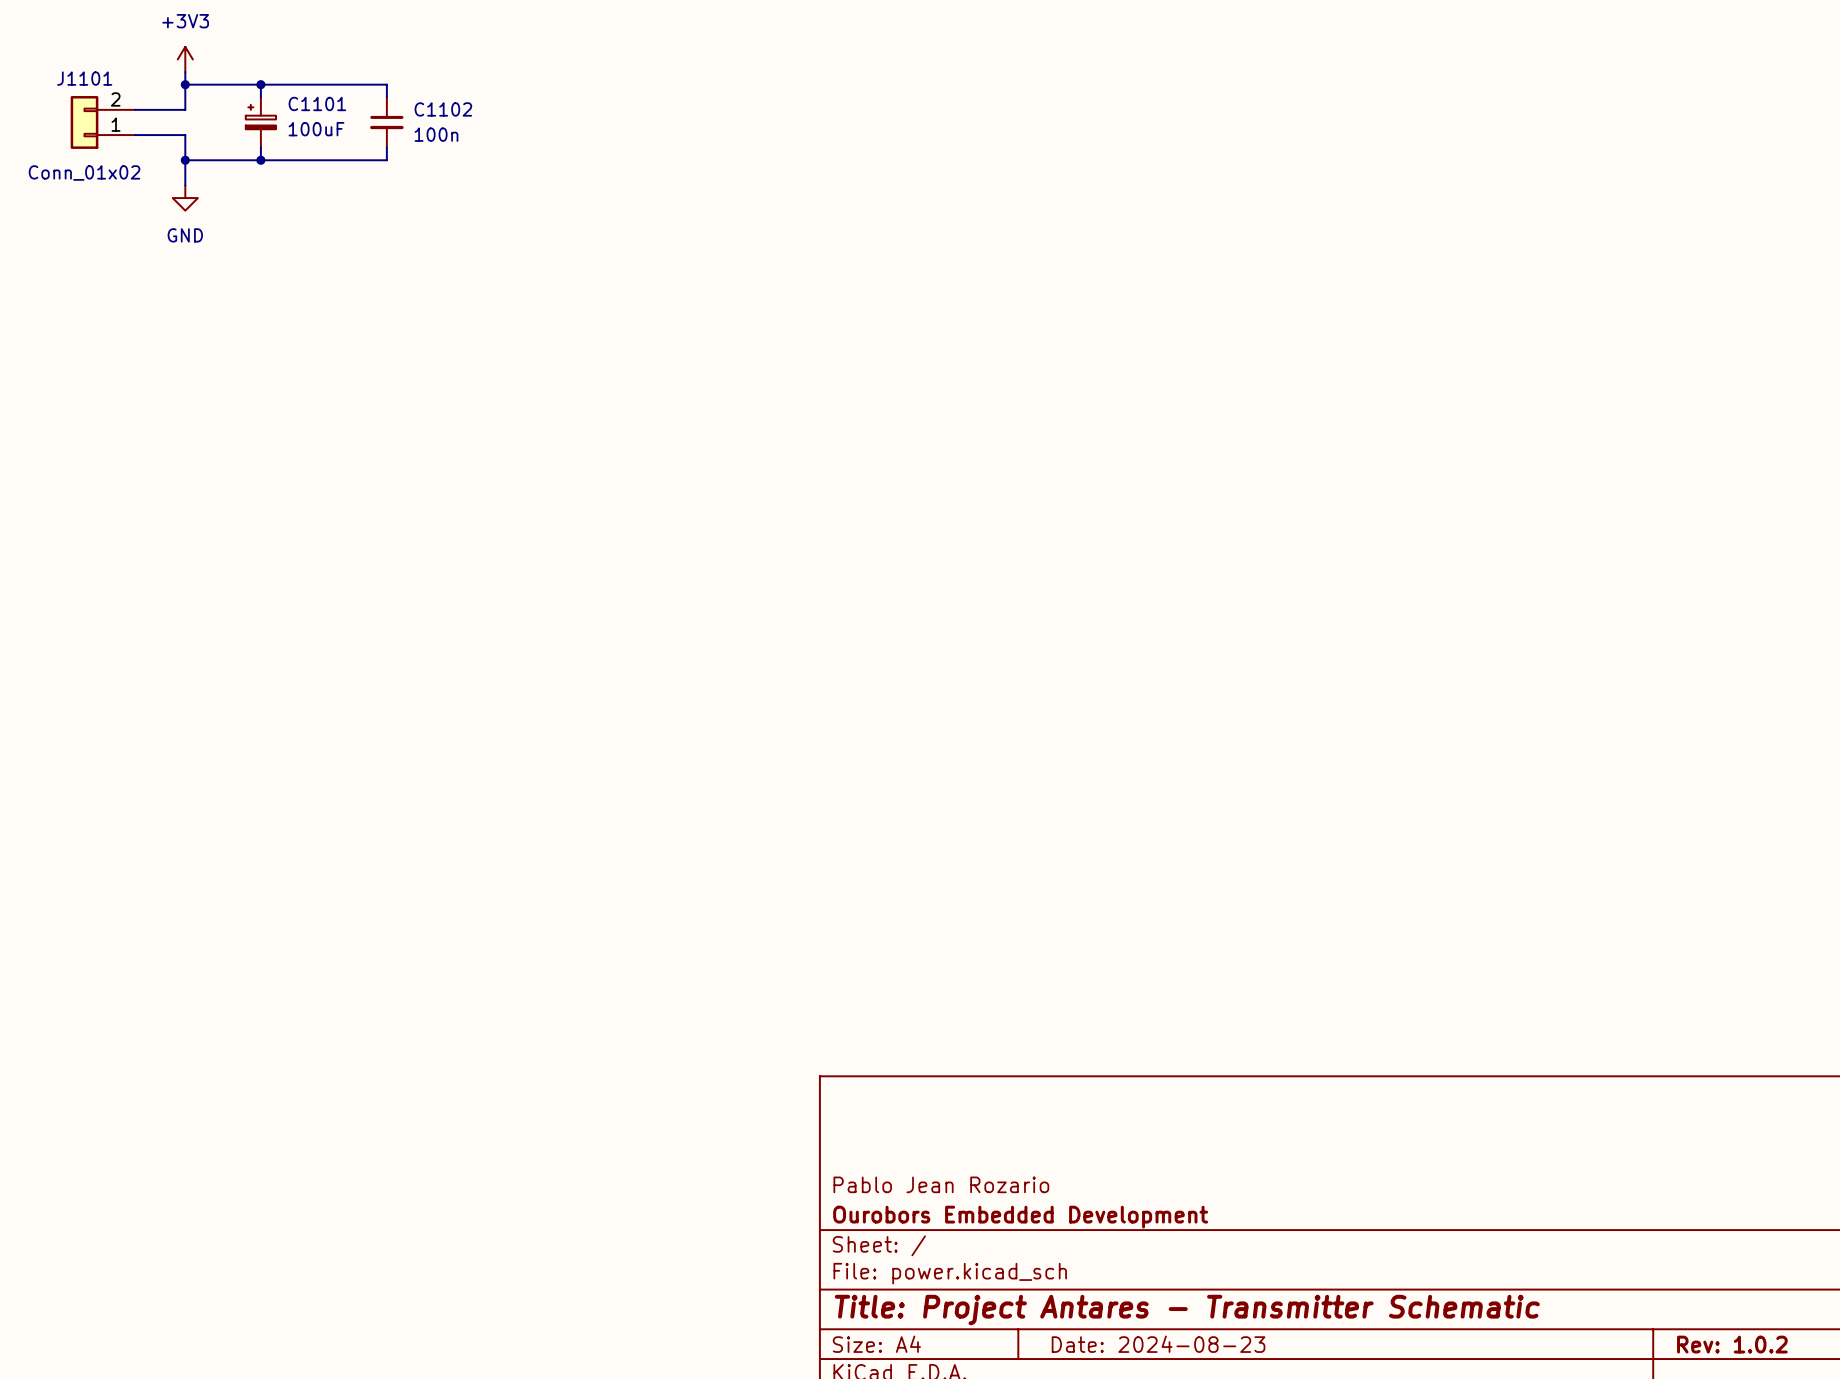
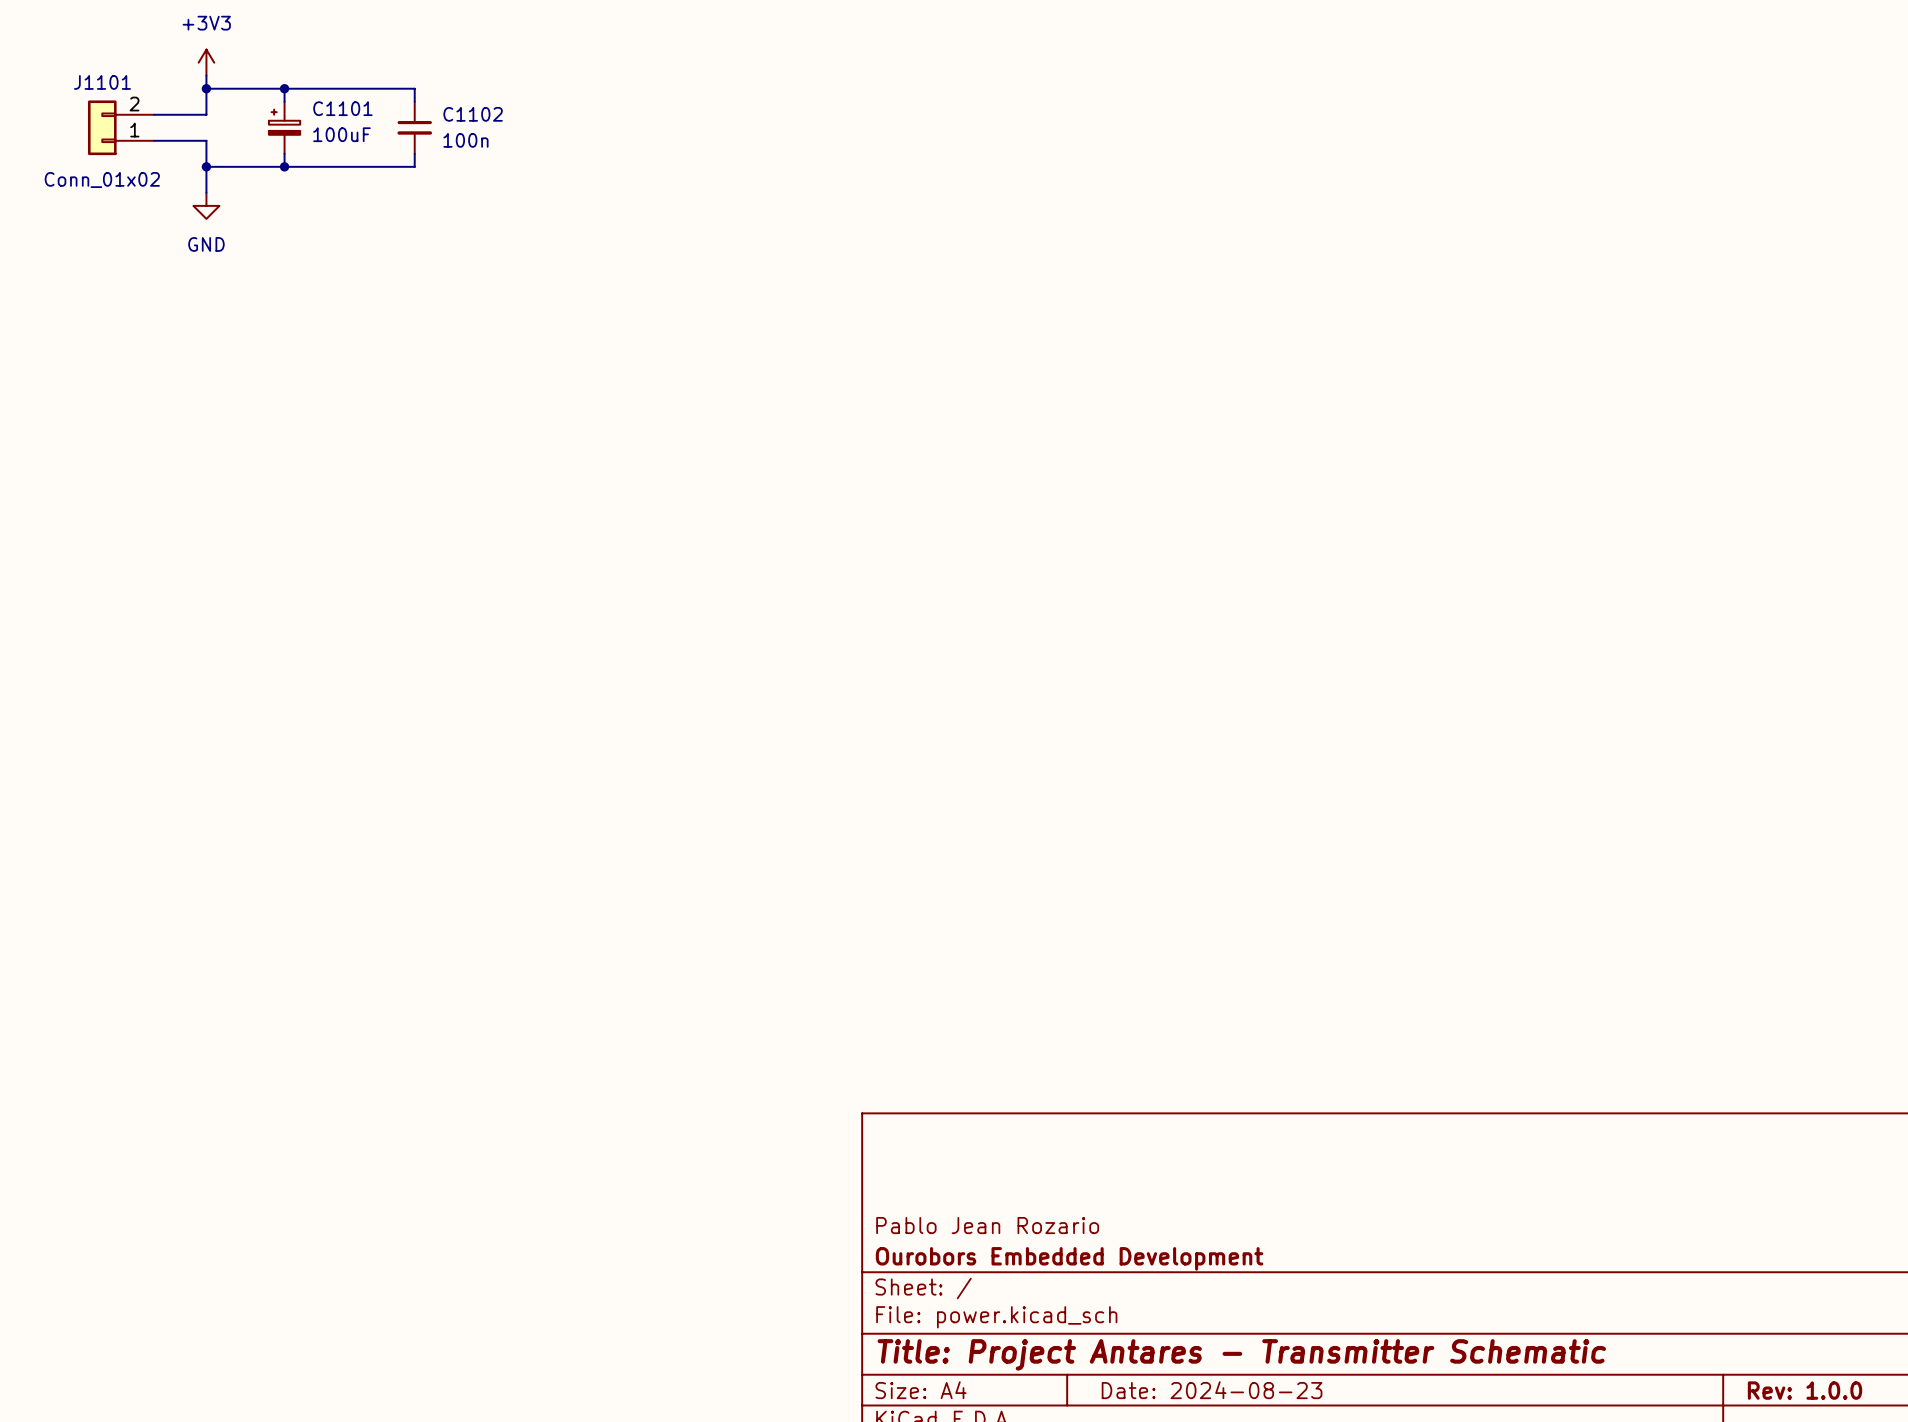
title block: Rev: 1.0.2 (1732, 1344) -> Rev: 1.0.0 (1805, 1390)

